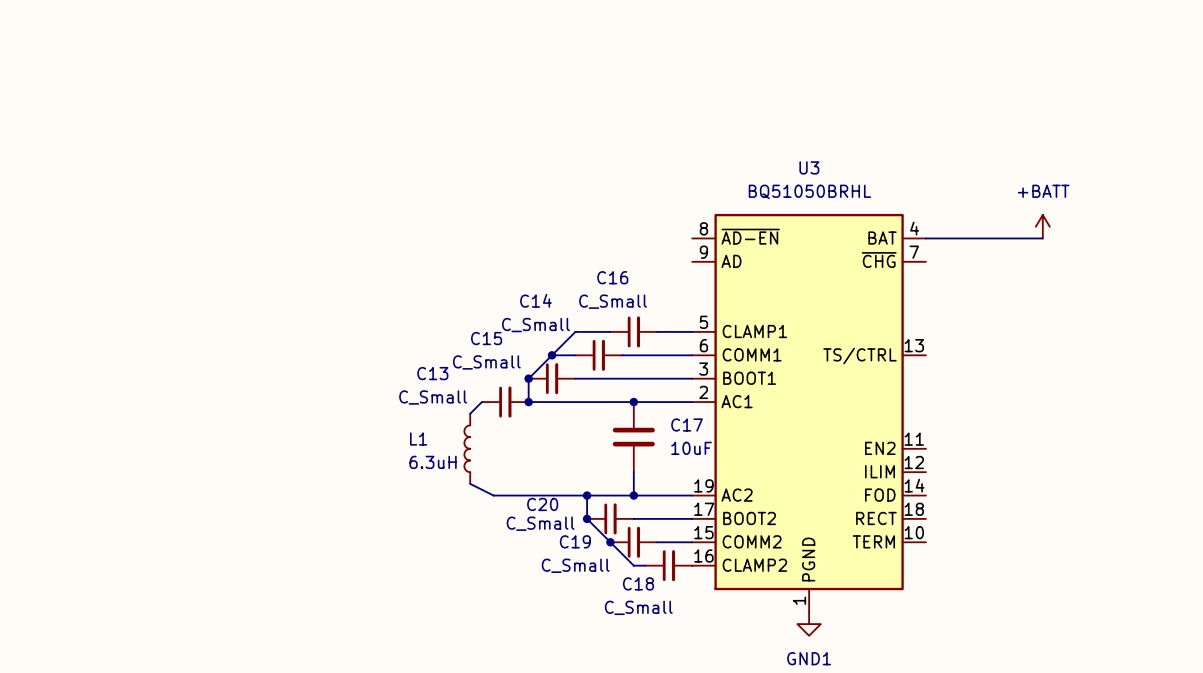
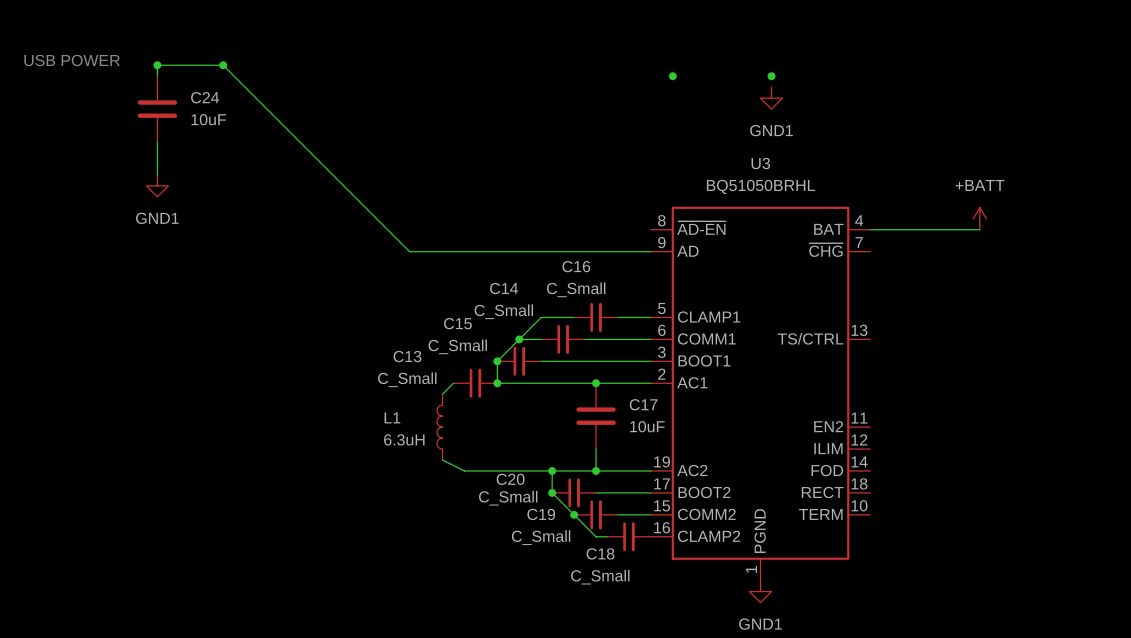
text: none -> USB POWER (72, 60)
junction: none -> (157, 65)
junction: none -> (223, 65)
wire: none -> (157, 76) (157, 65) (223, 65) (409, 251) (650, 251)
junction: none -> (672, 76)
junction: none -> (771, 76)
power symbol: none -> GND1 (771, 98)
C24: none -> 10uF (157, 109)
wire: none -> (157, 142) (157, 174)
power symbol: none -> GND1 (157, 185)

